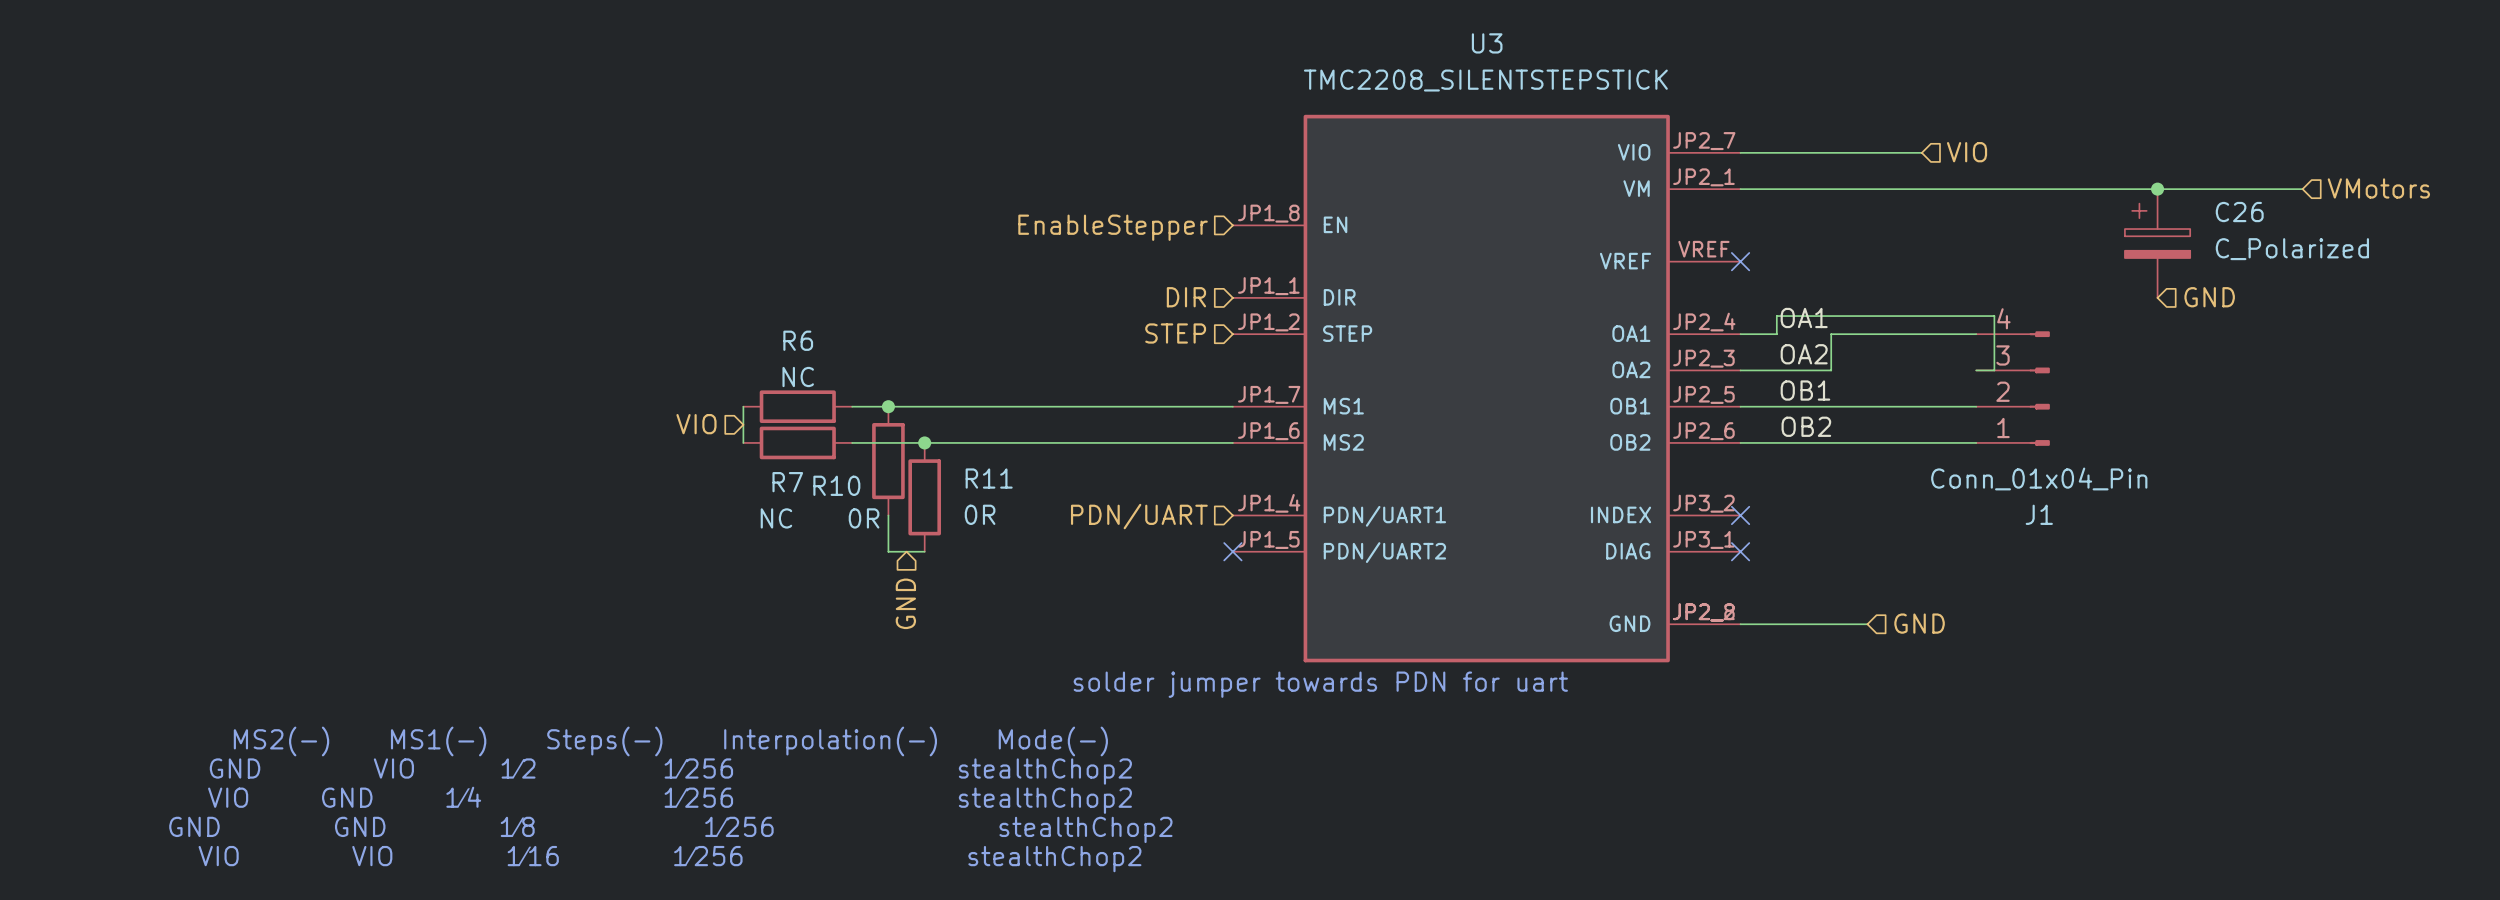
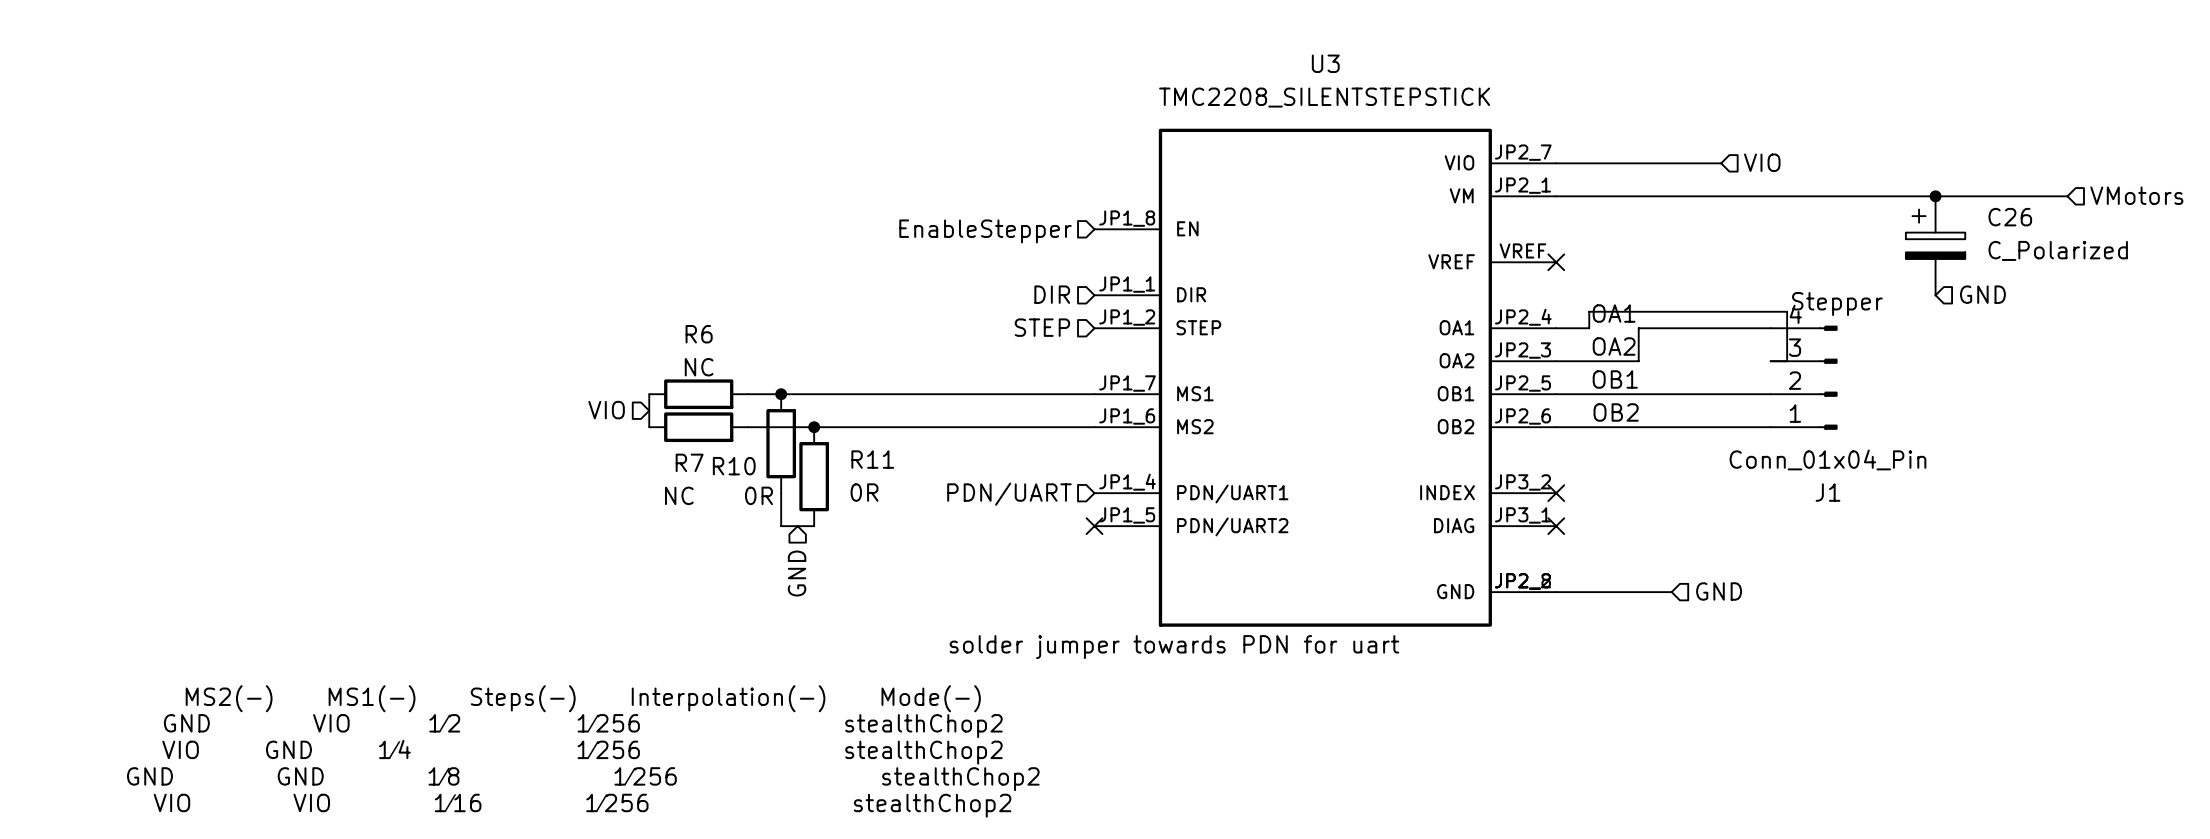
J1 text: none -> Stepper (1837, 304)

